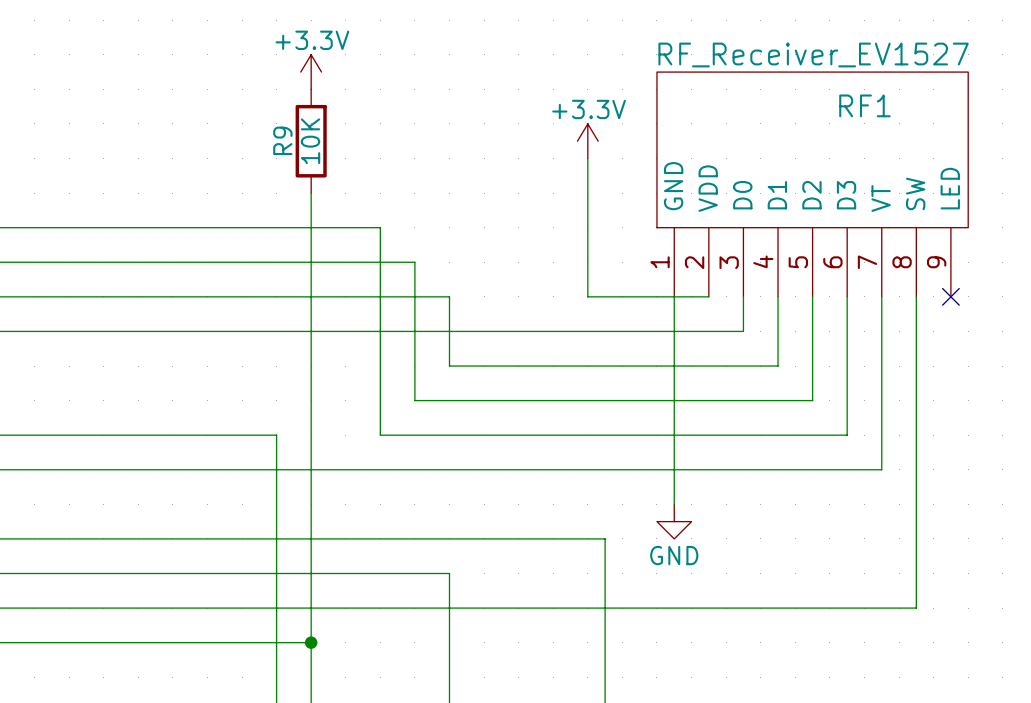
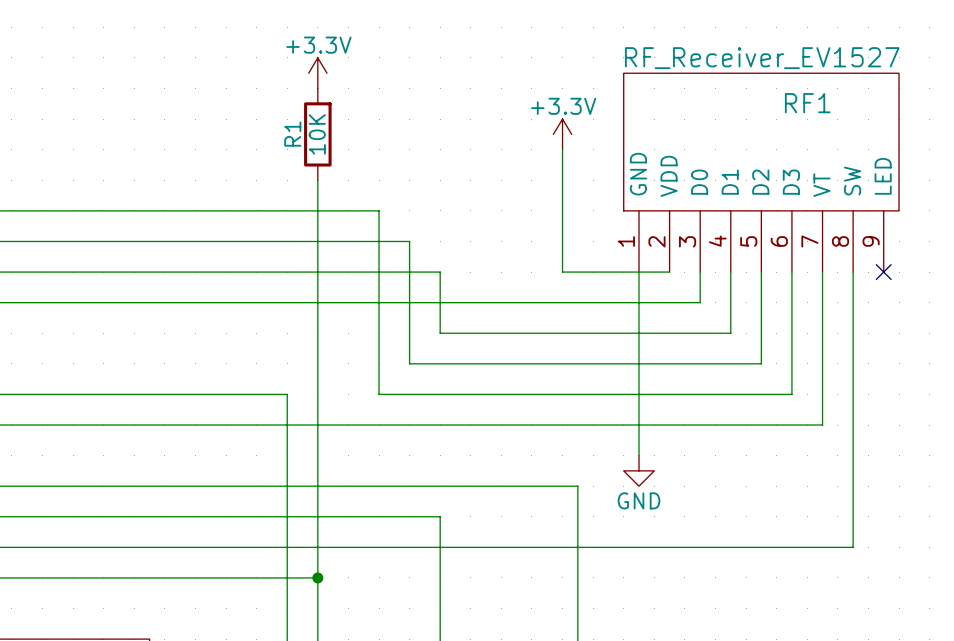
R9 name: R9 (282, 140) -> R1 (292, 134)

